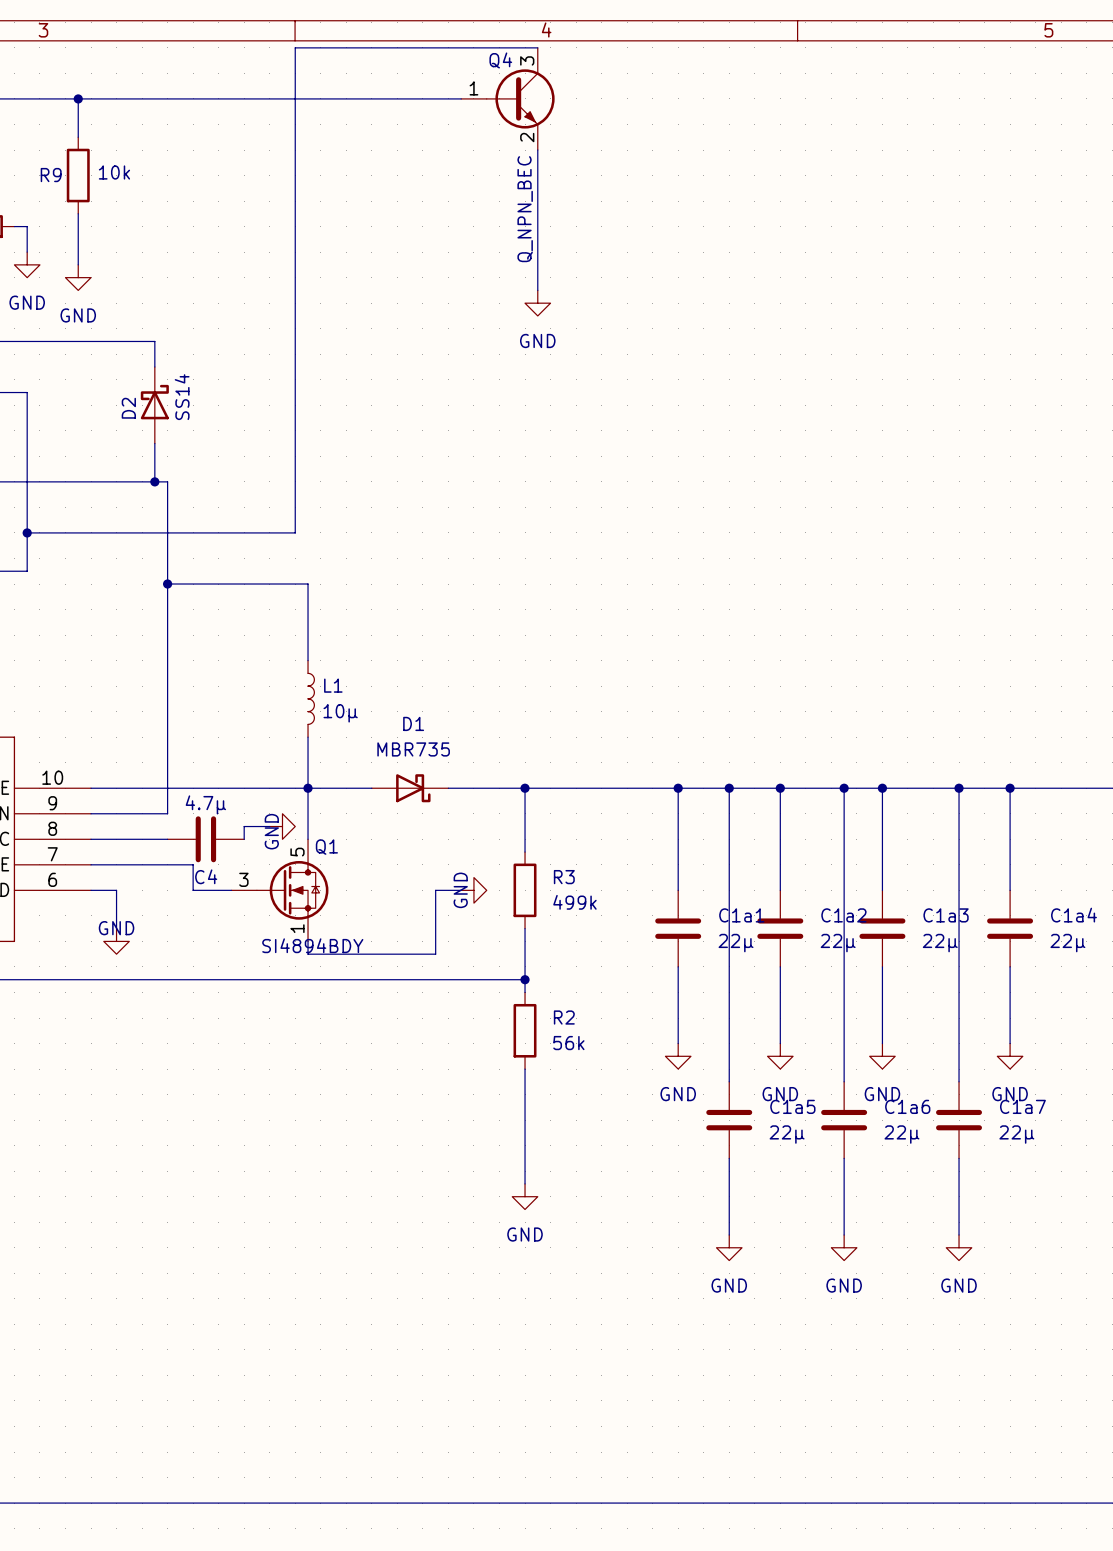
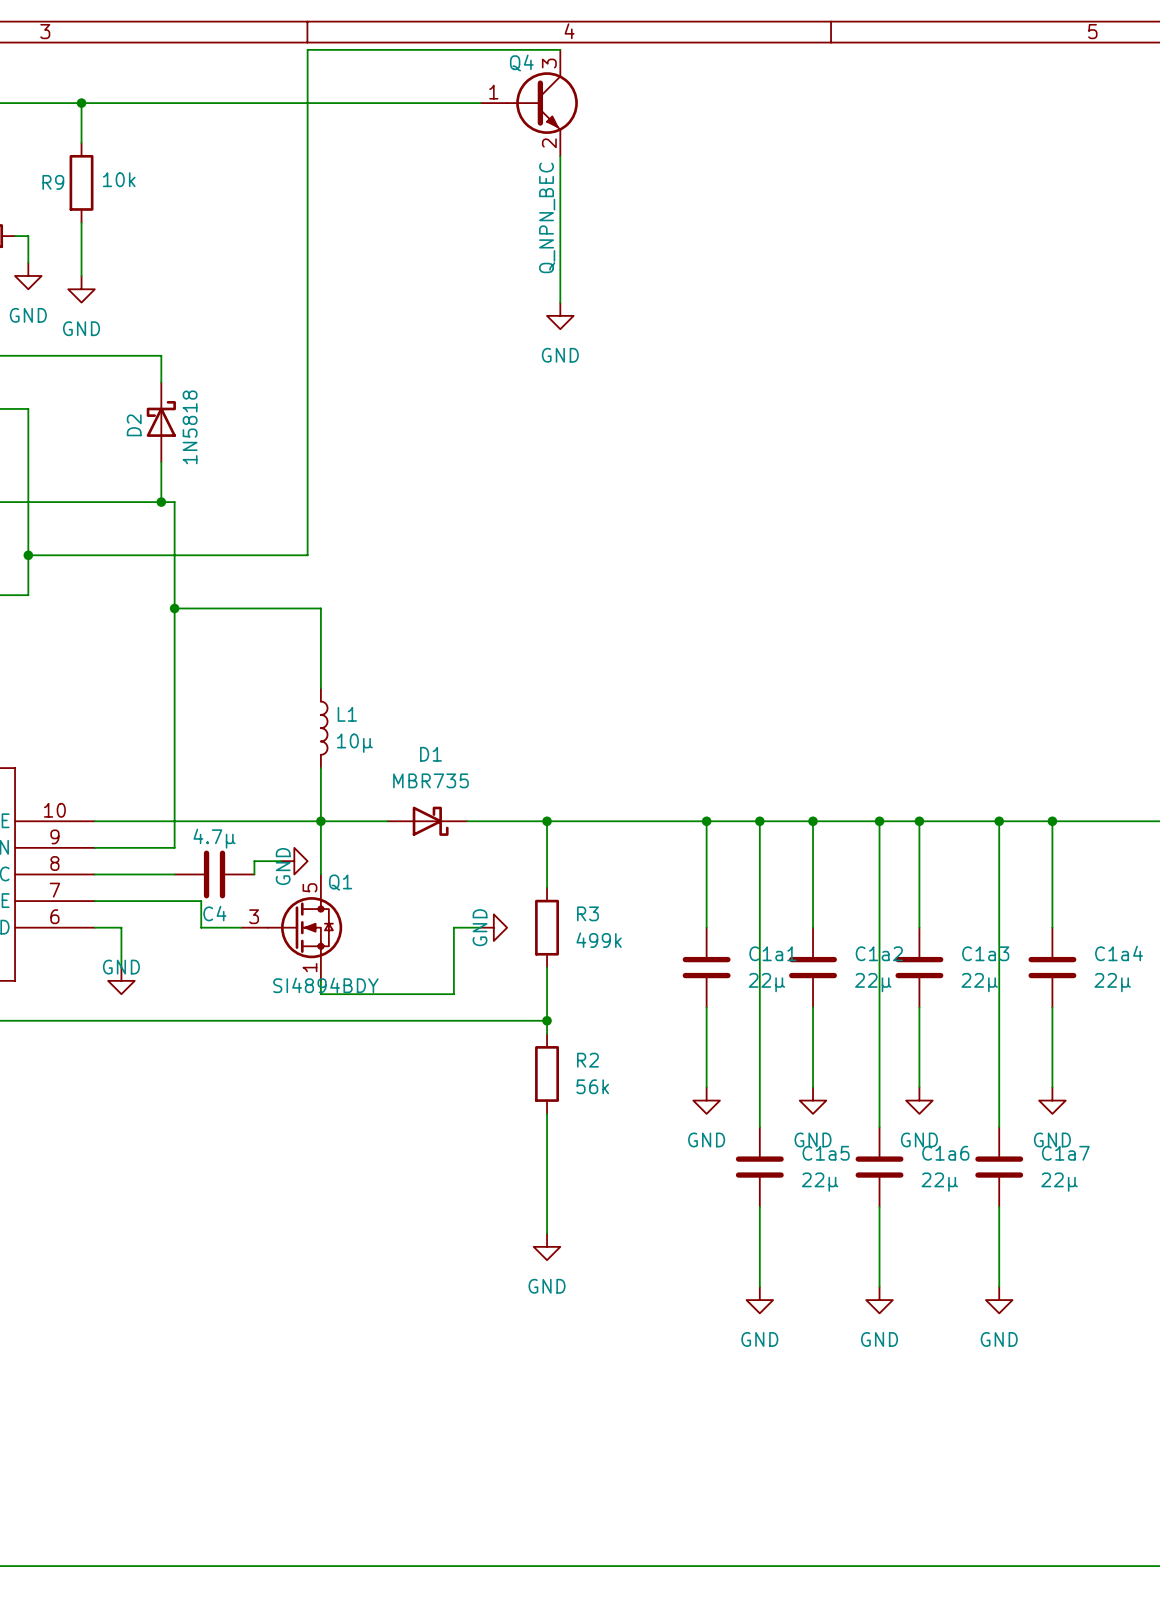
D2 value: SS14 (182, 397) -> 1N5818 (190, 427)

